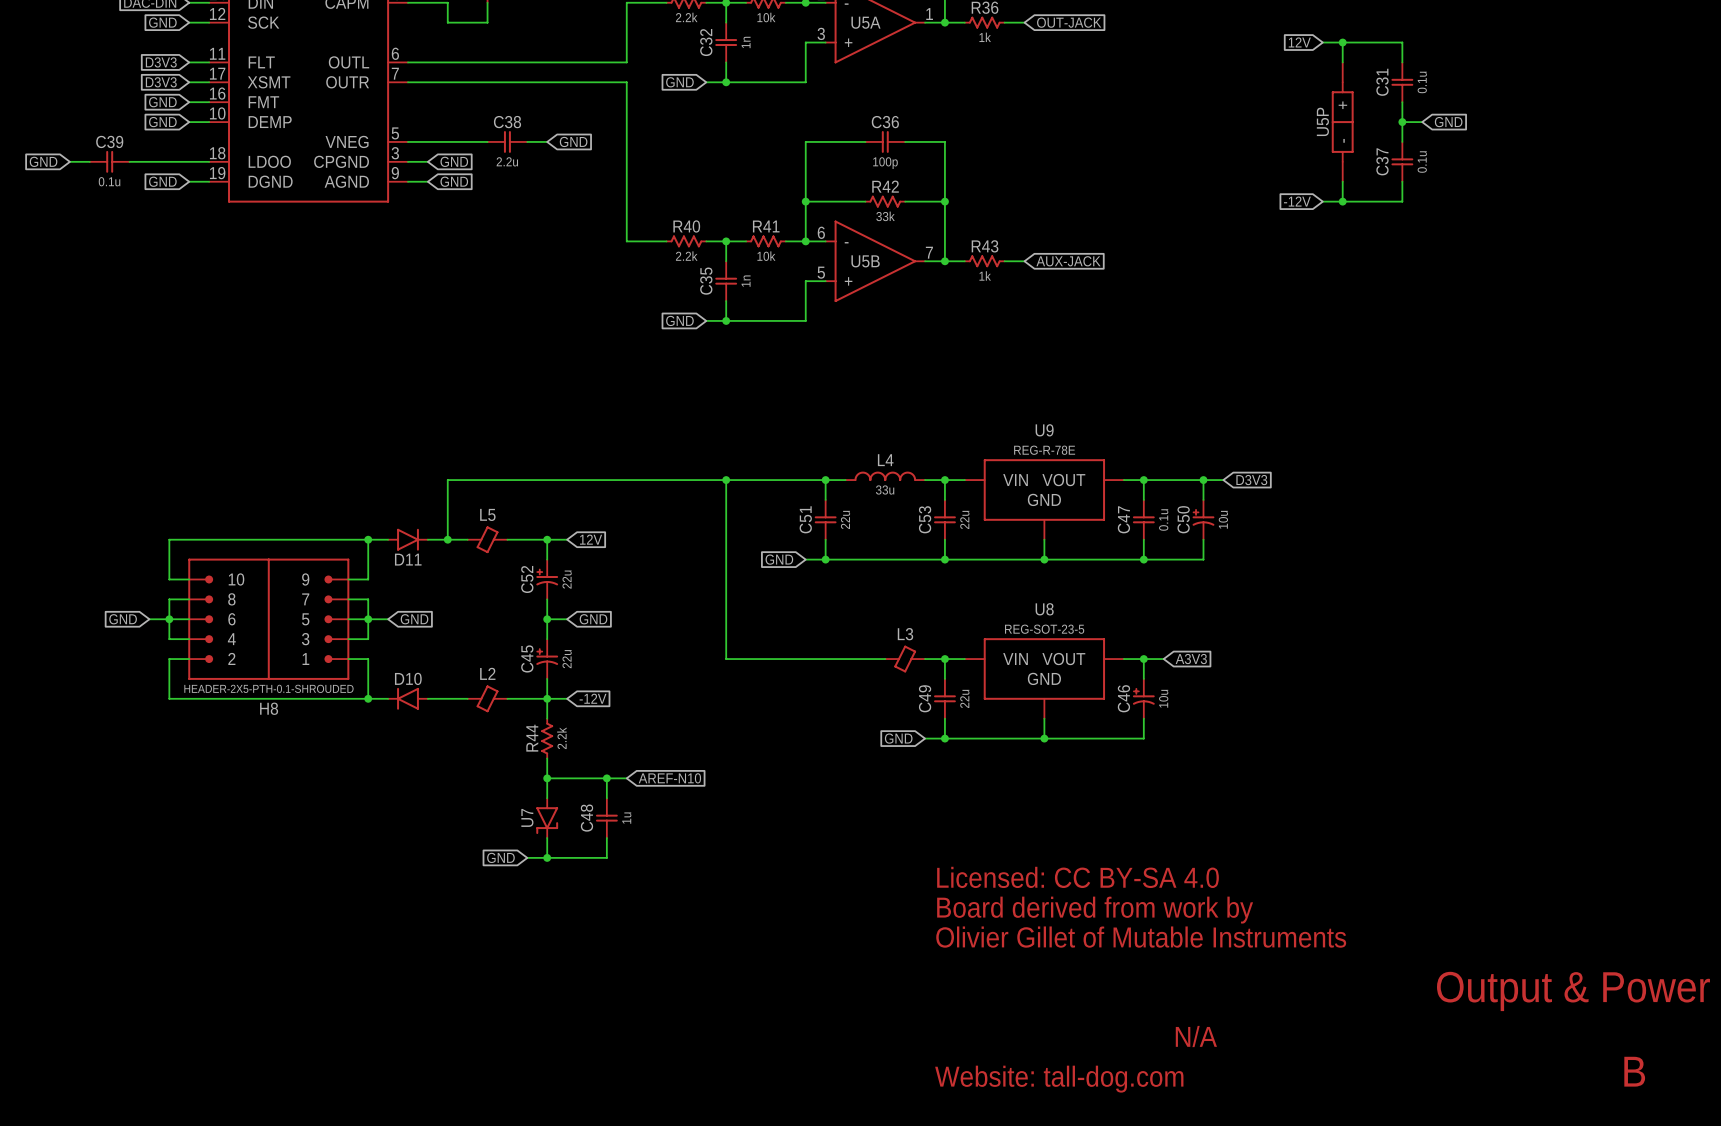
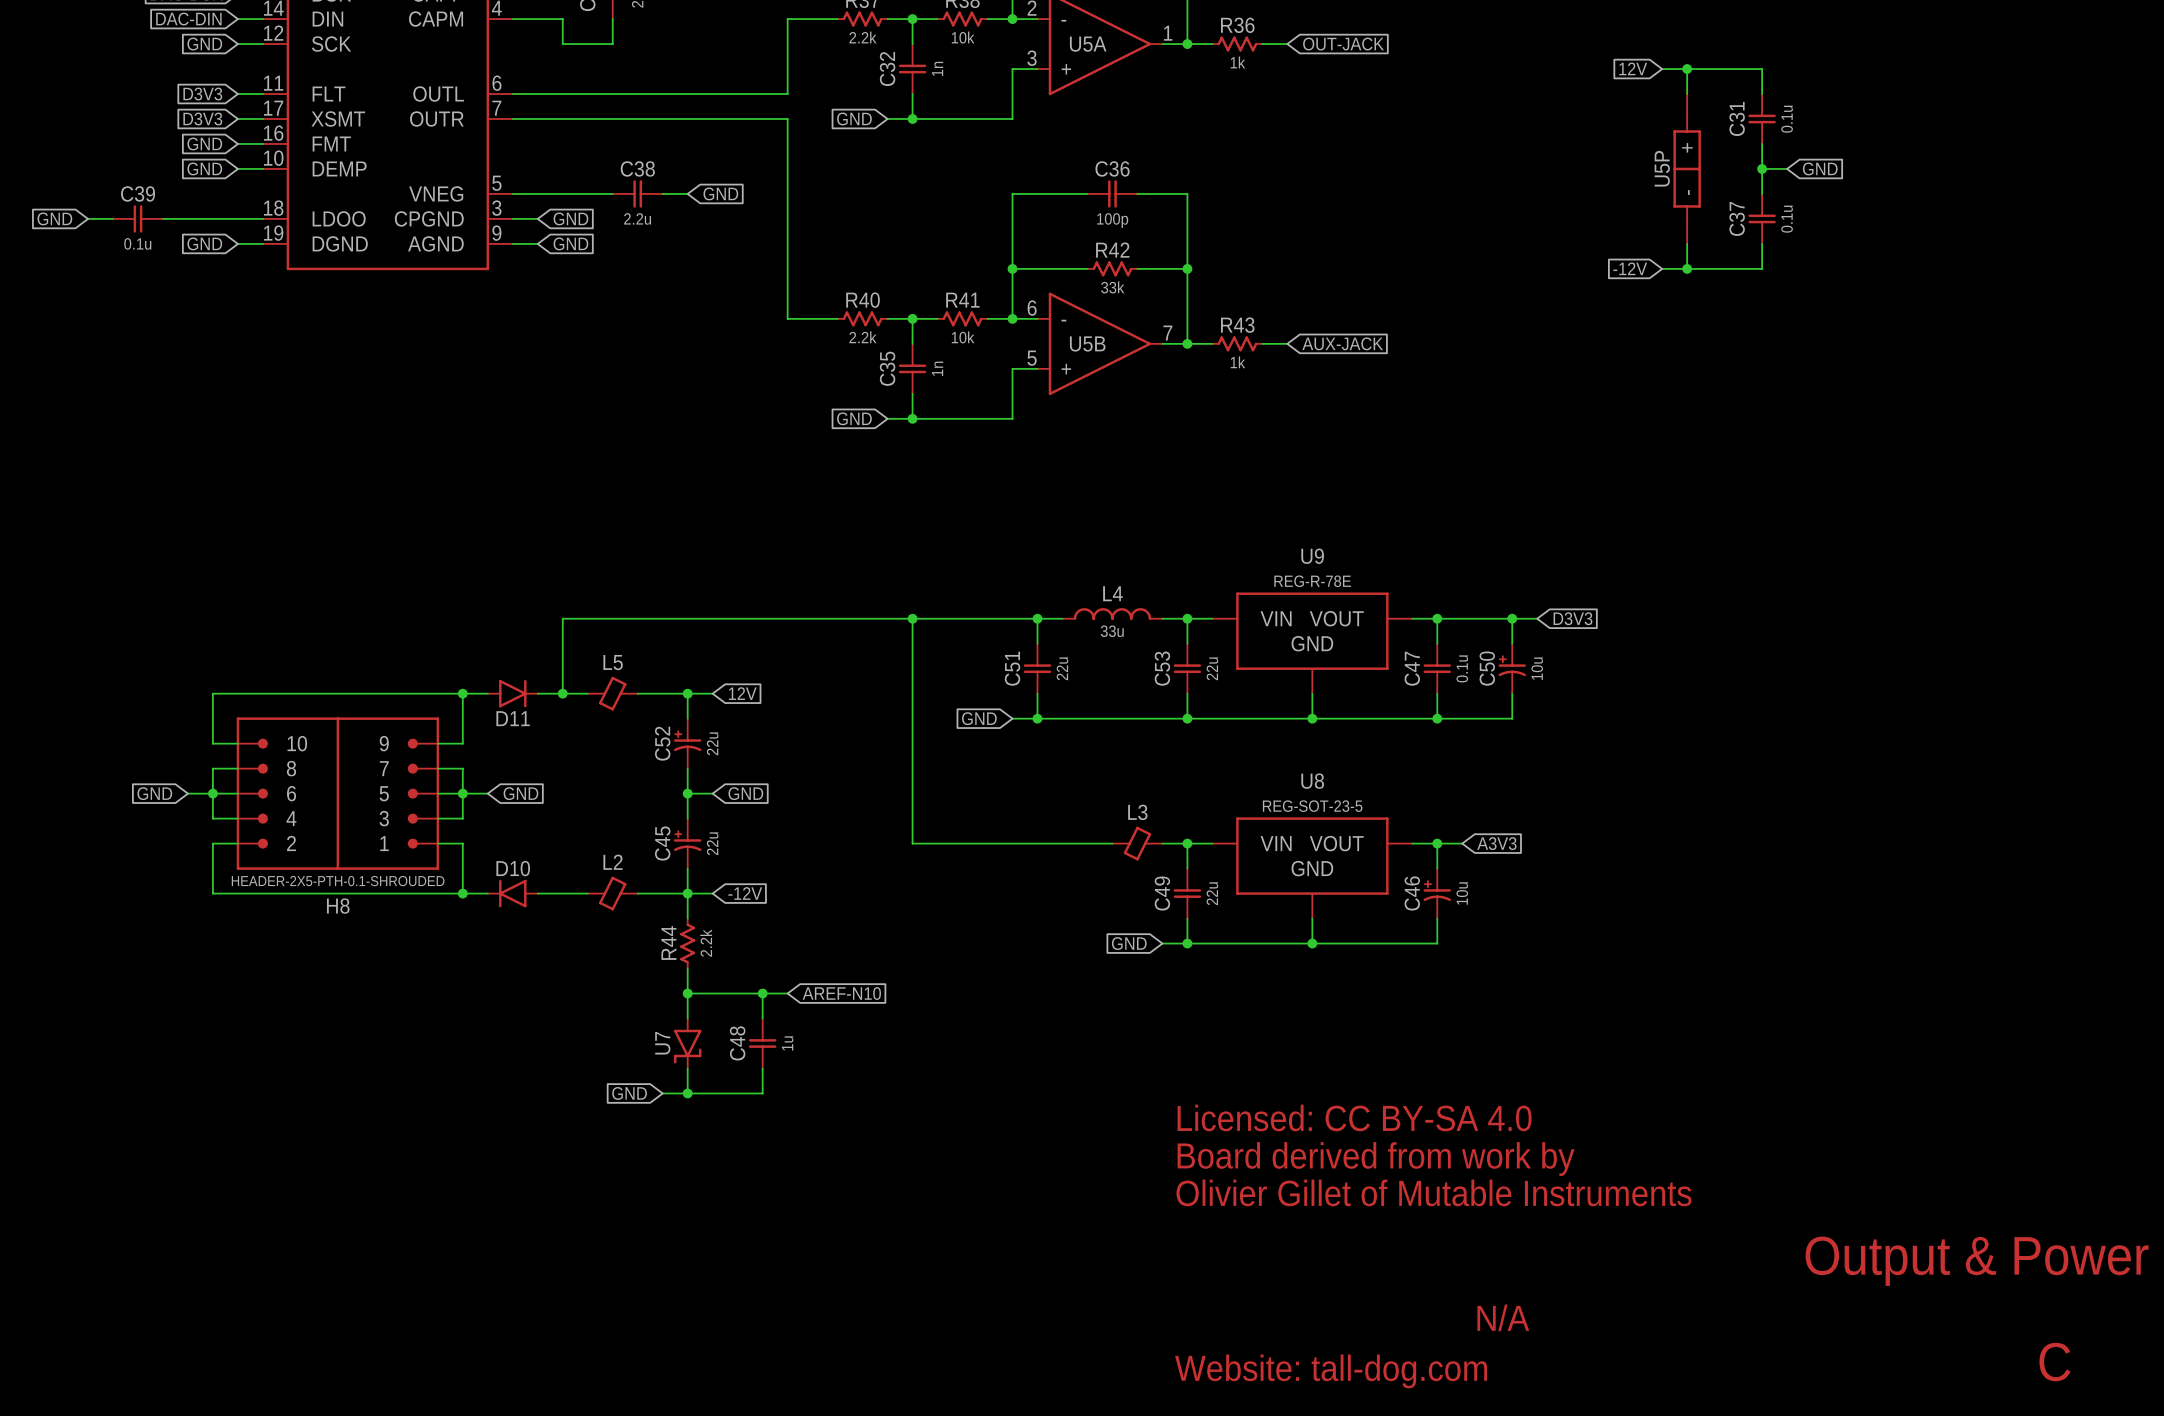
text: B (1634, 1071) -> C (2054, 1362)

